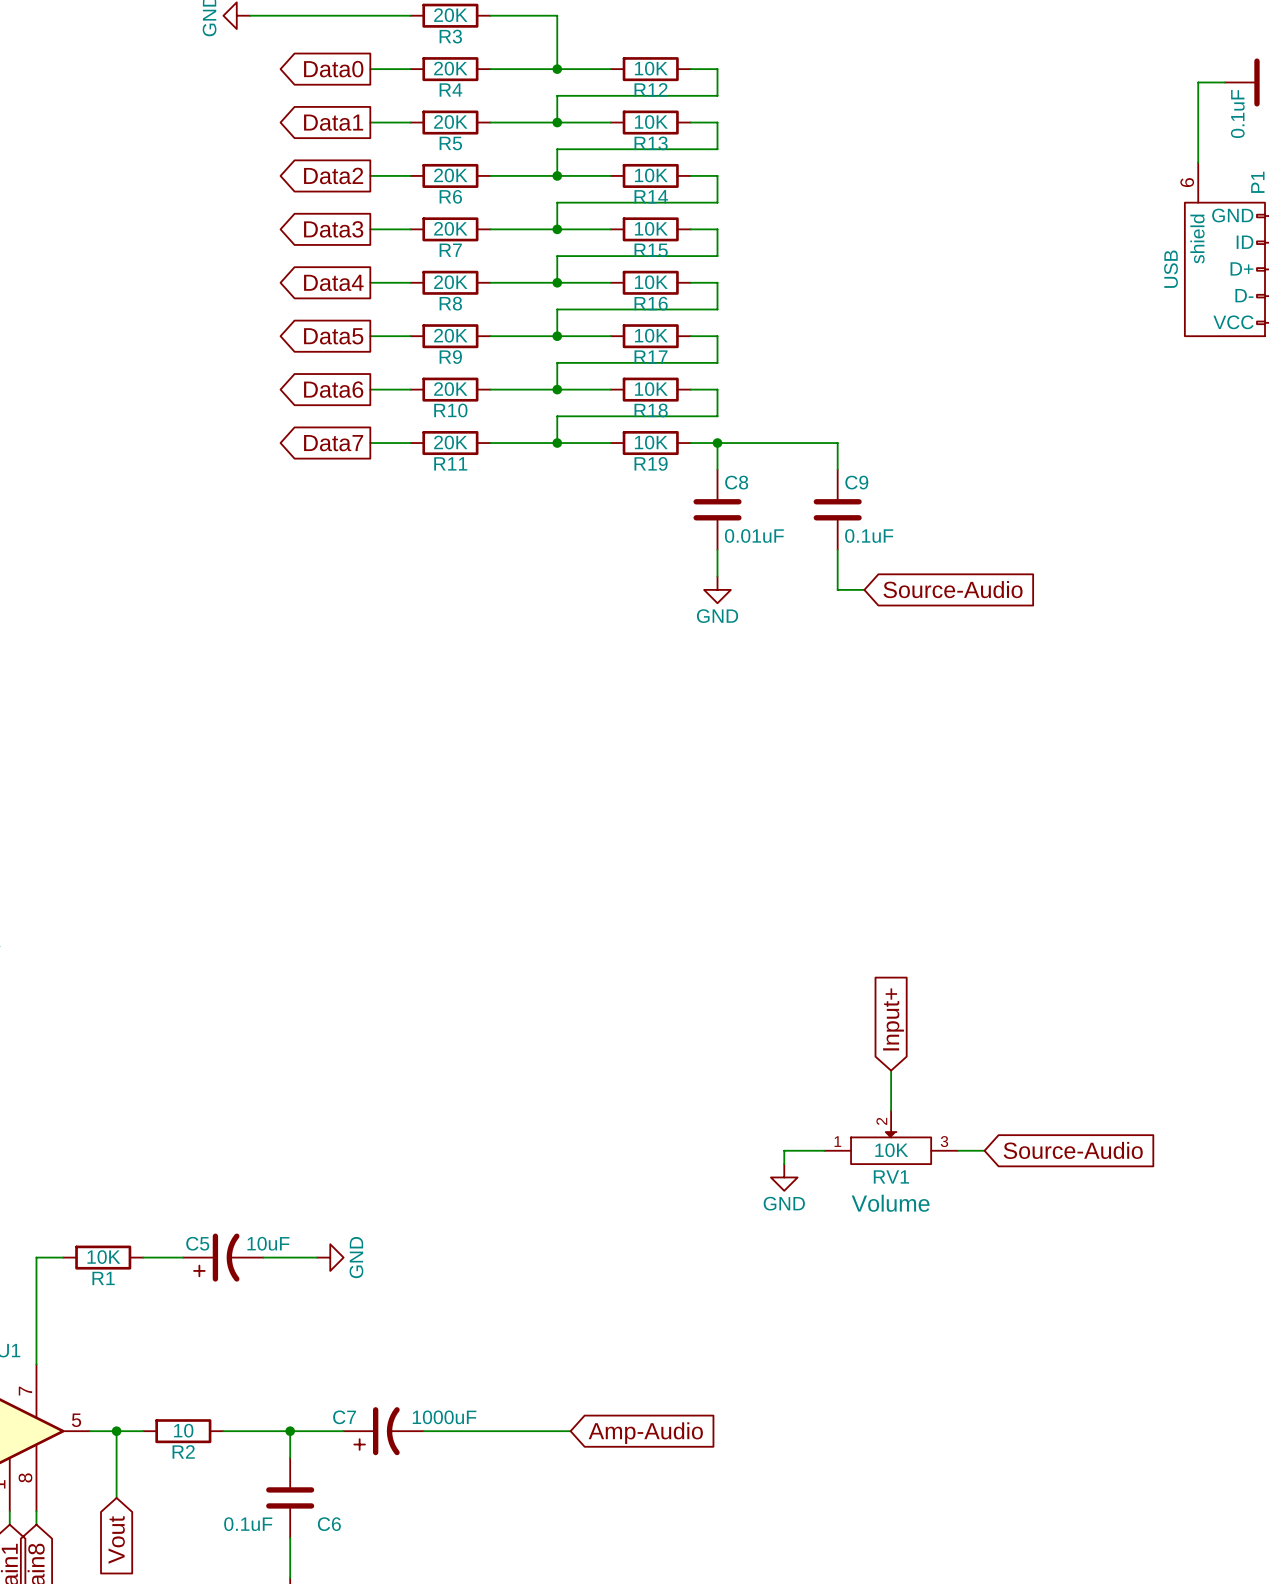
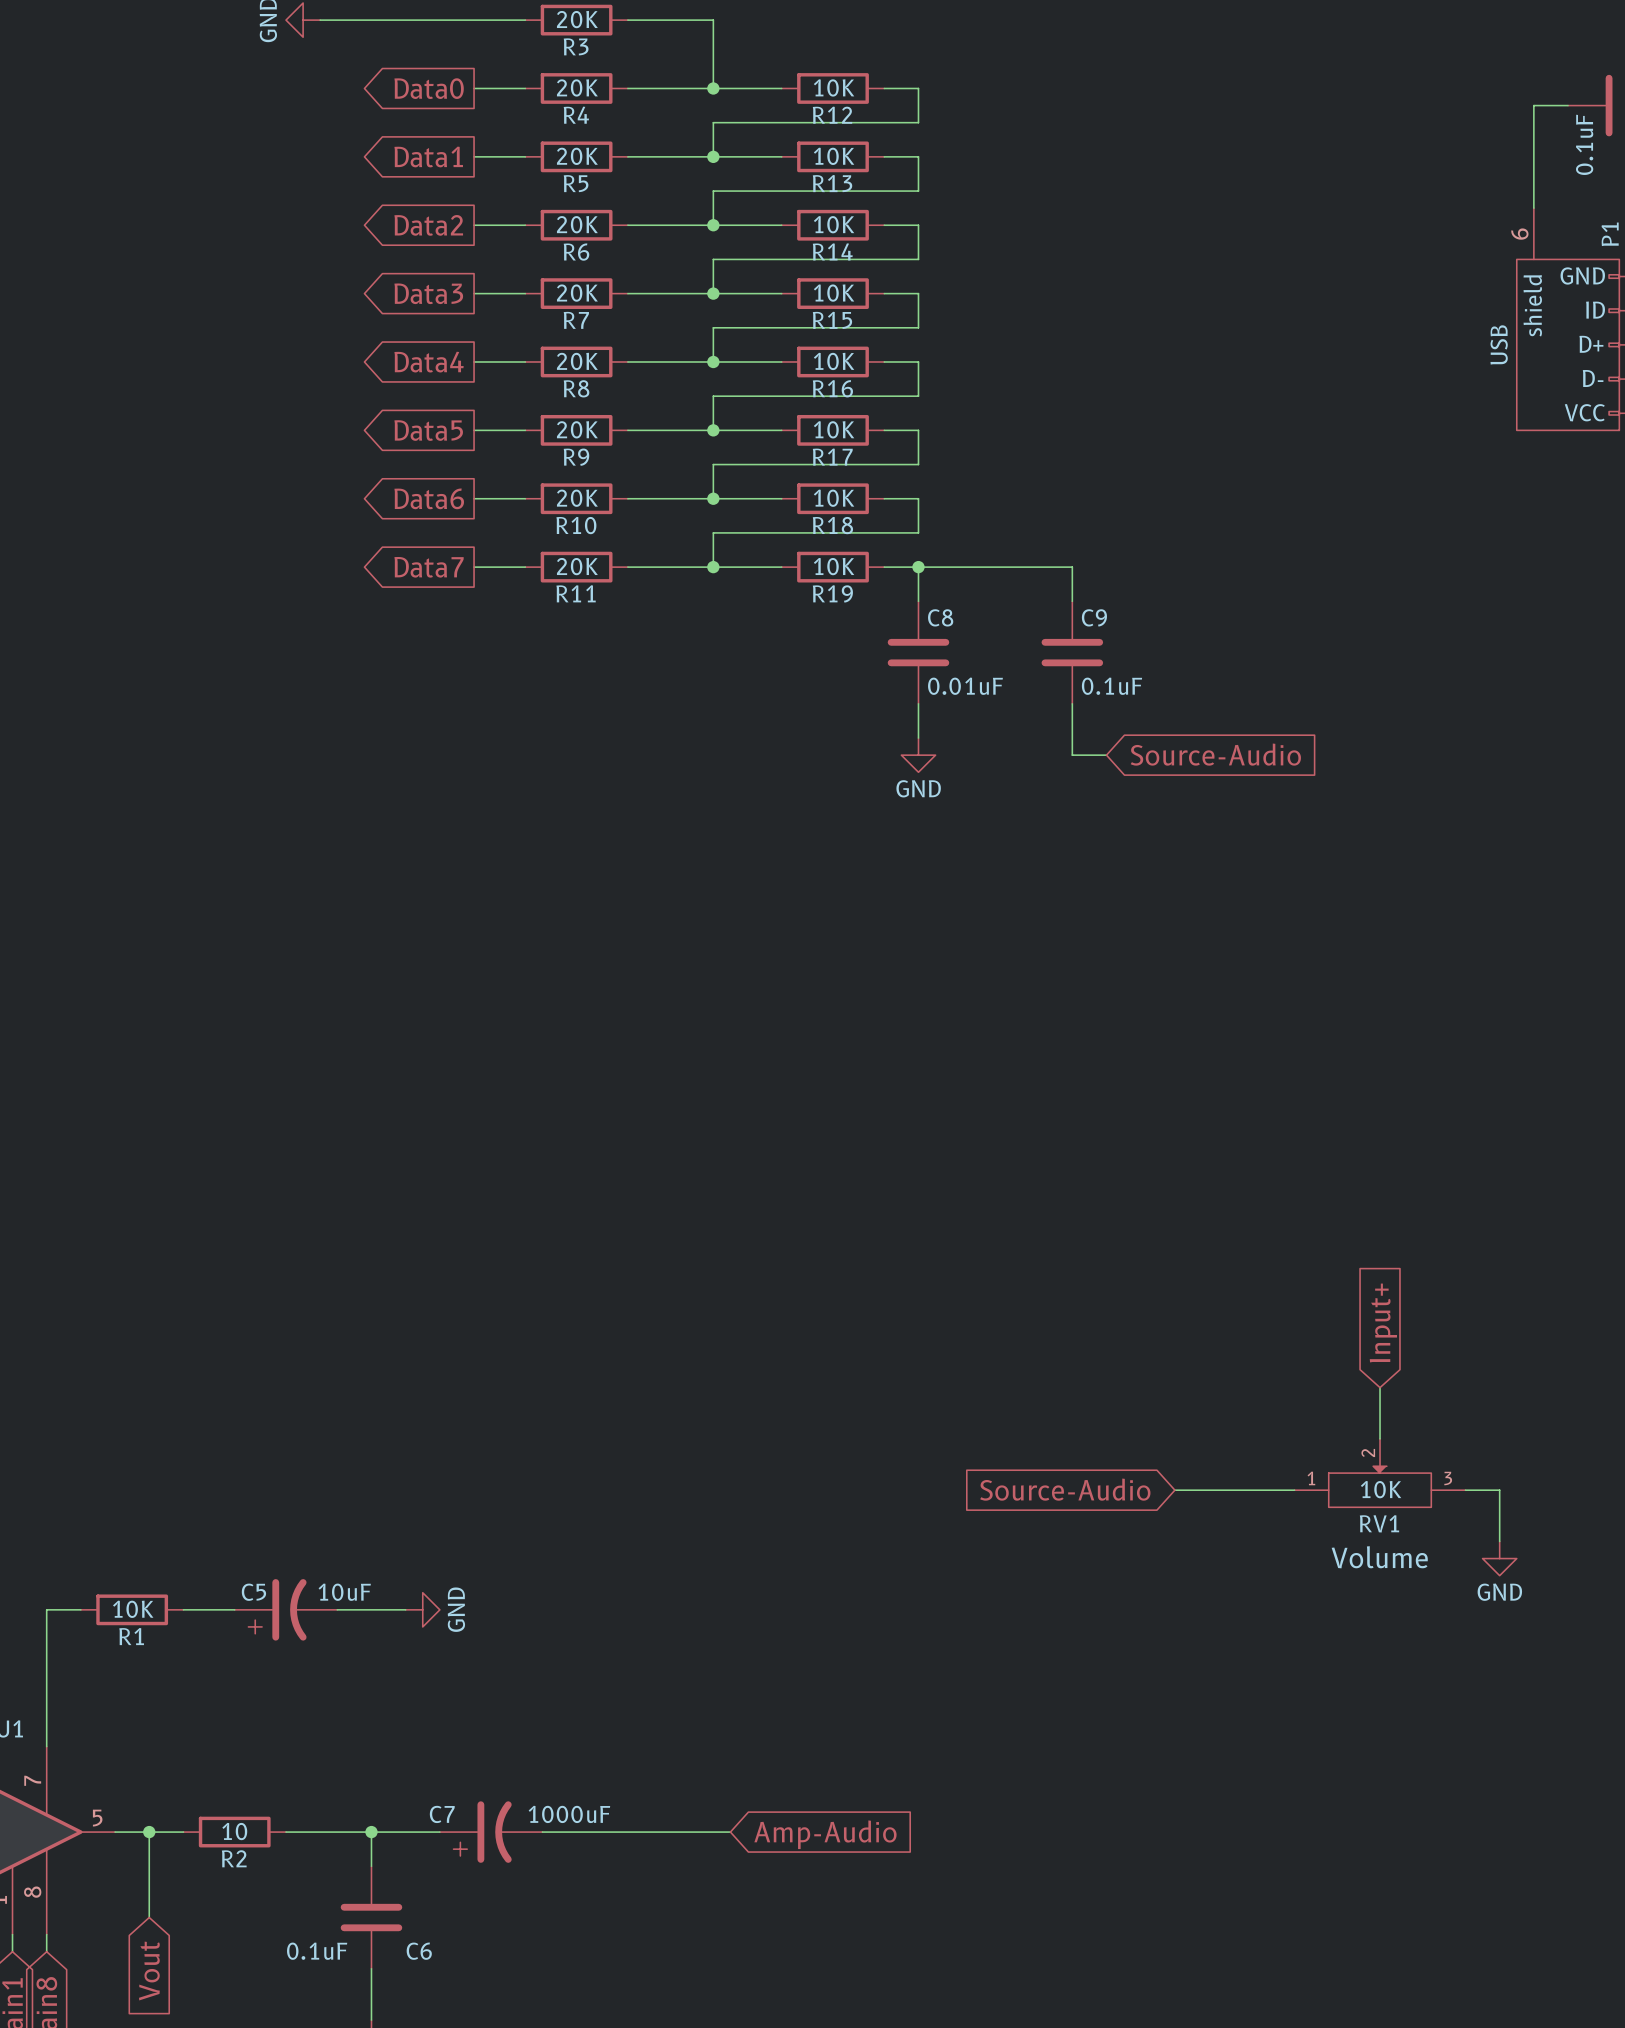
global label position: Input+ (893, 1019) -> Input+ (1383, 1322)
wire: (891, 1070) (891, 1110) -> (1380, 1387) (1380, 1438)
RV1 position: (891, 1137) -> (1380, 1473)
wire: (824, 1150) (784, 1150) (784, 1164) -> none
wire: (957, 1150) (984, 1150) -> none
global label rotation: 0° (1073, 1150) -> 180° (1065, 1489)
global label position: Source-Audio (1073, 1150) -> Source-Audio (1065, 1489)
wire: none -> (1174, 1490) (1294, 1490)
wire: none -> (1465, 1490) (1499, 1490) (1499, 1541)
power symbol: GND (784, 1177) -> none
power symbol: none -> GND (1499, 1558)

